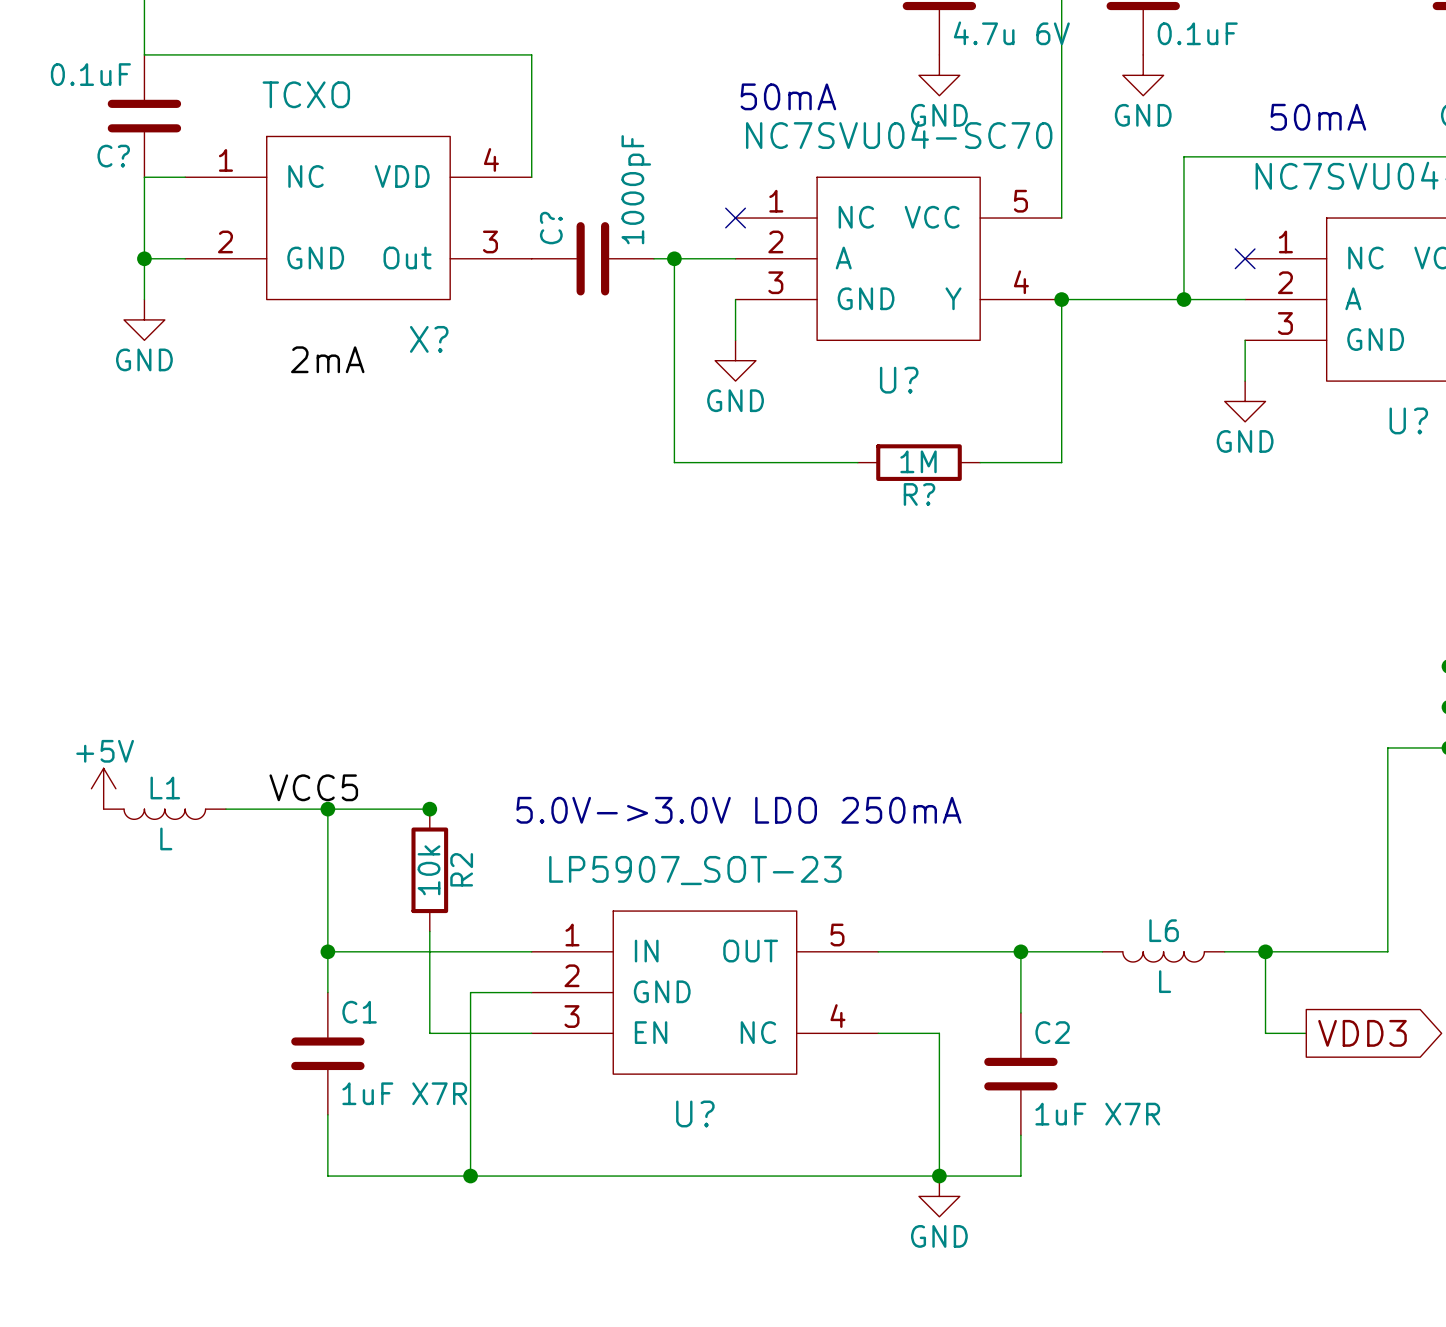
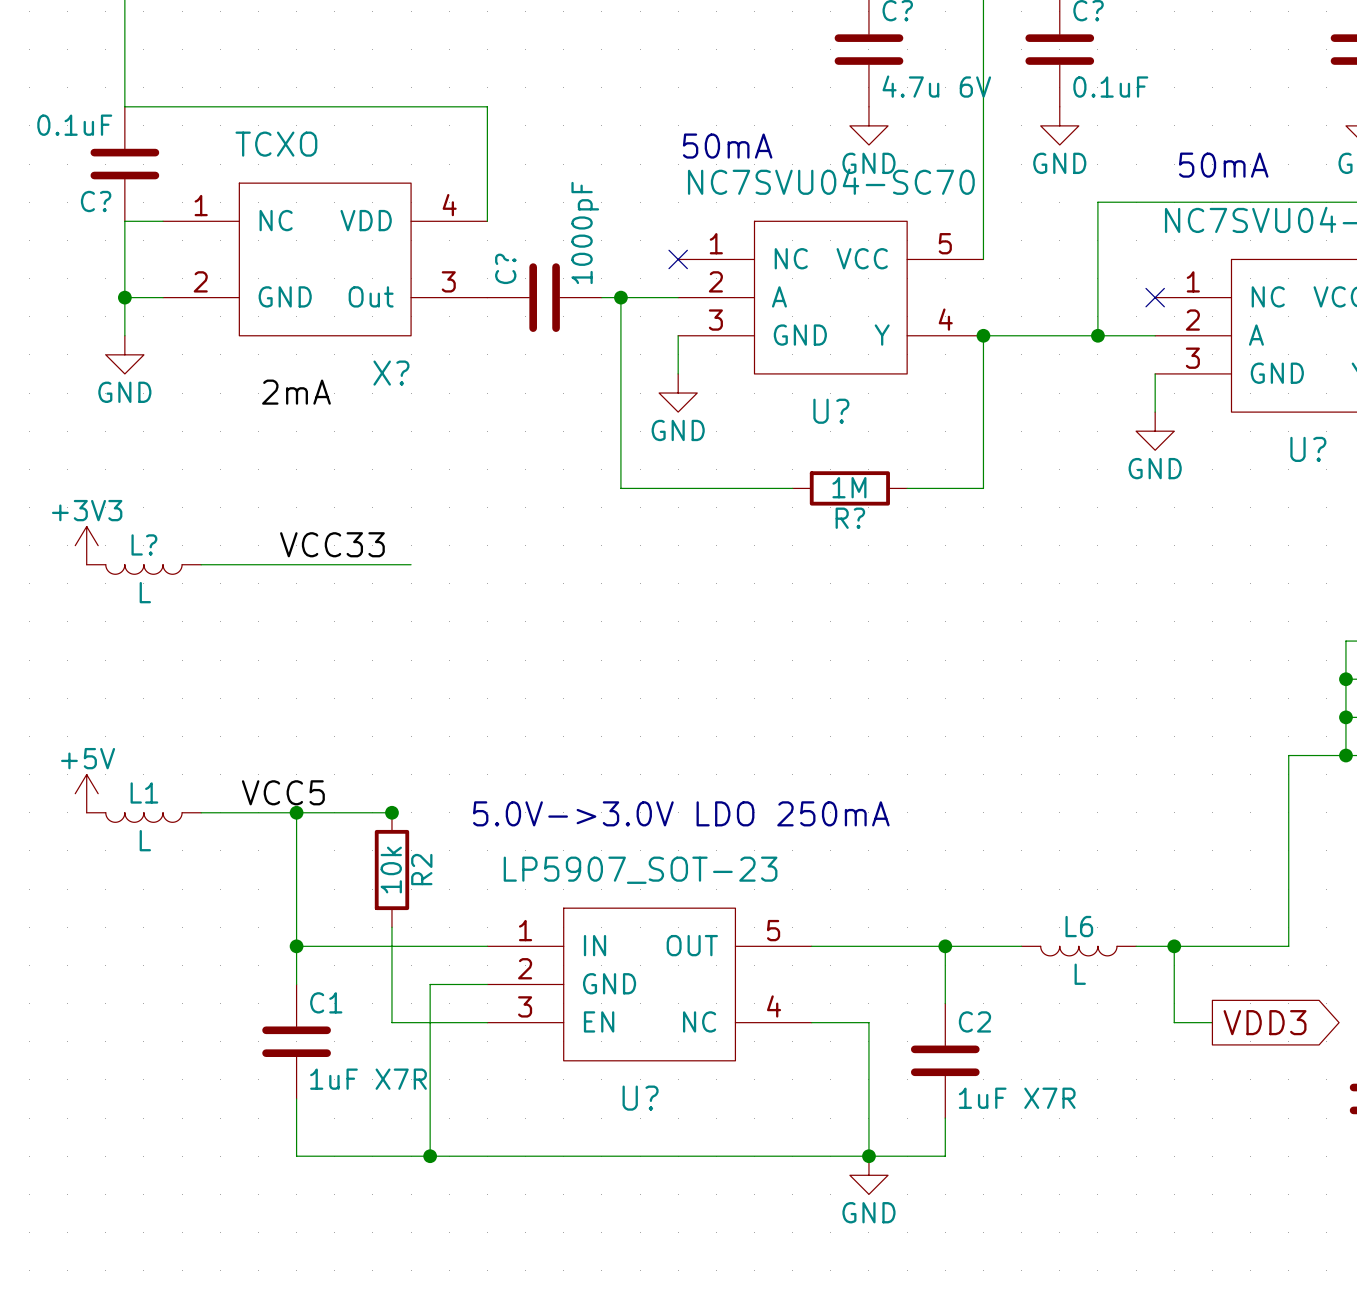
label: none -> VCC33 (332, 544)
power symbol: none -> +3V3 (86, 545)
wire: none -> (201, 564) (411, 564)
L?: none -> L (143, 569)

